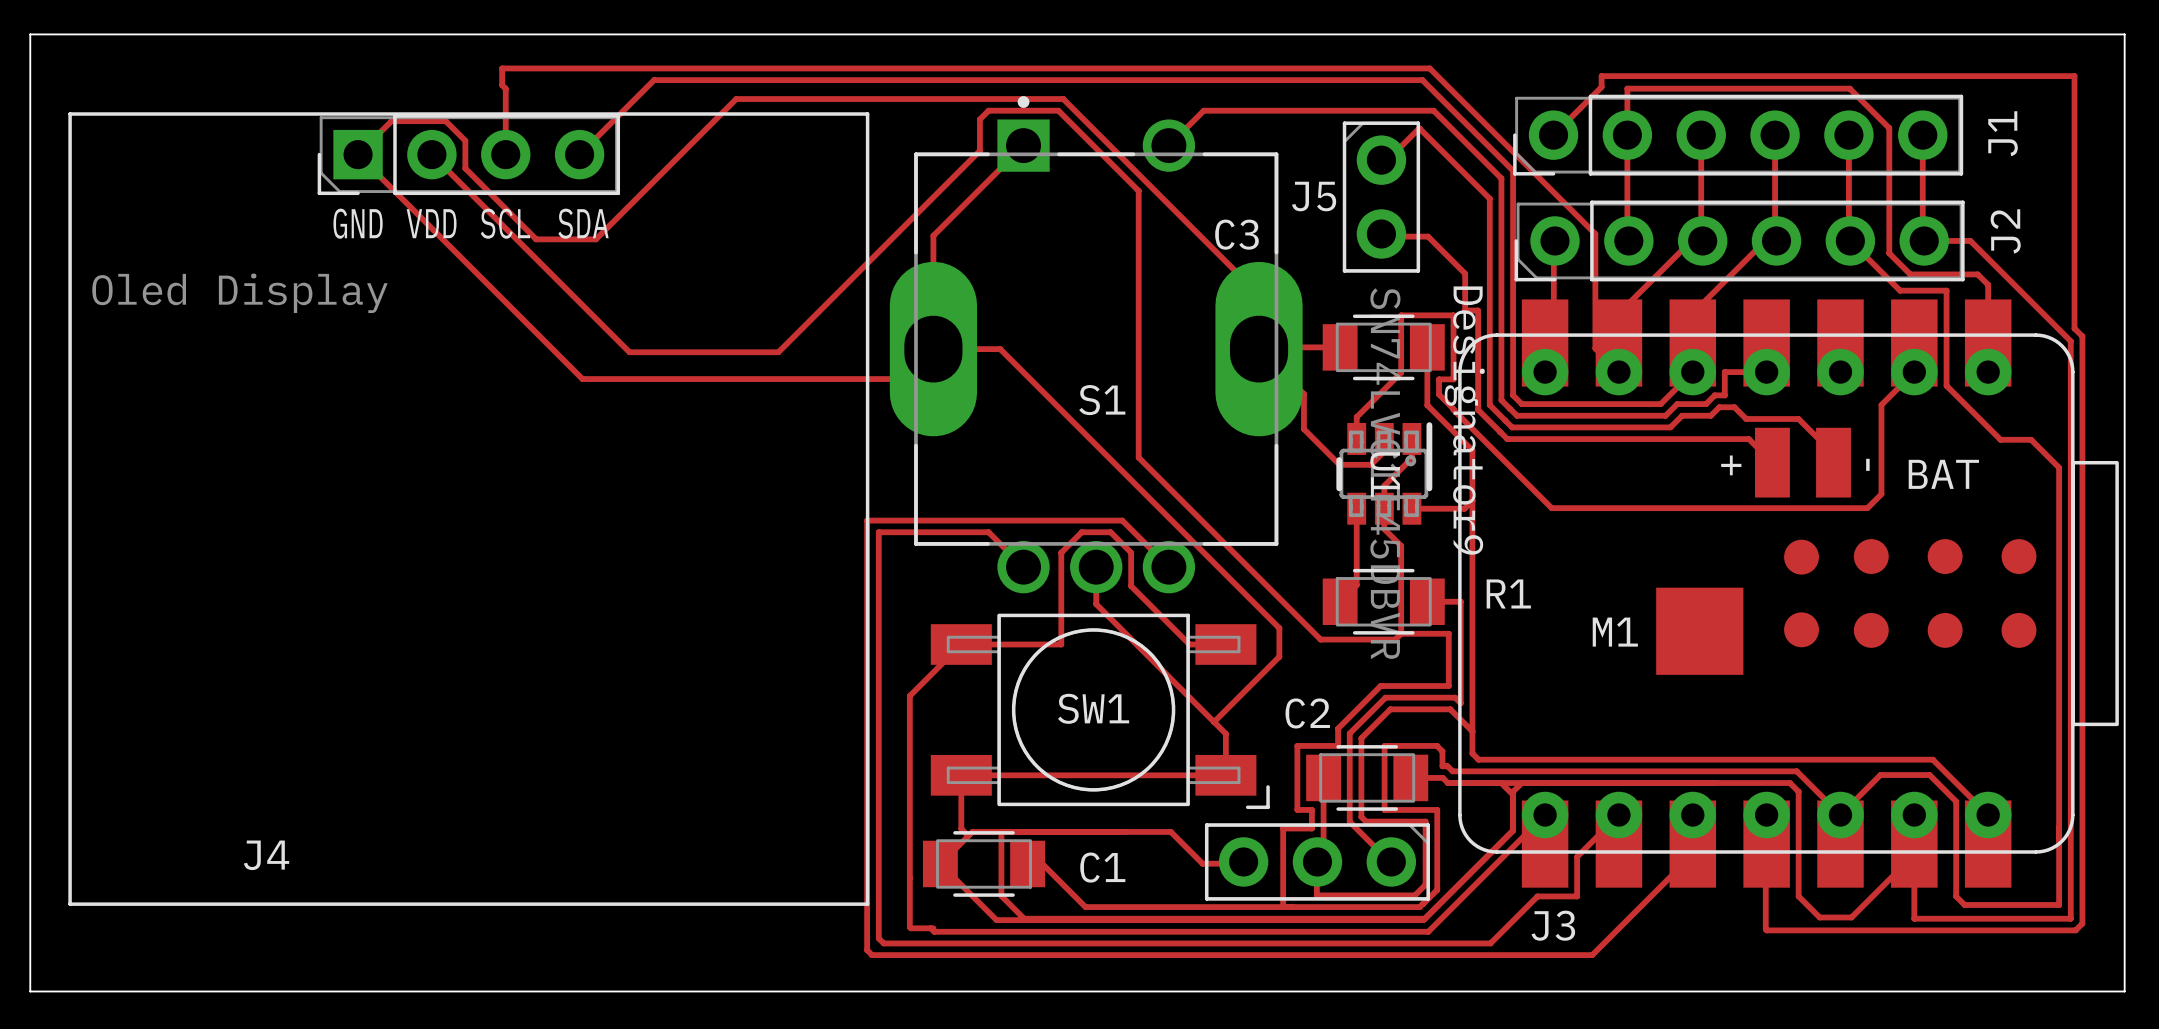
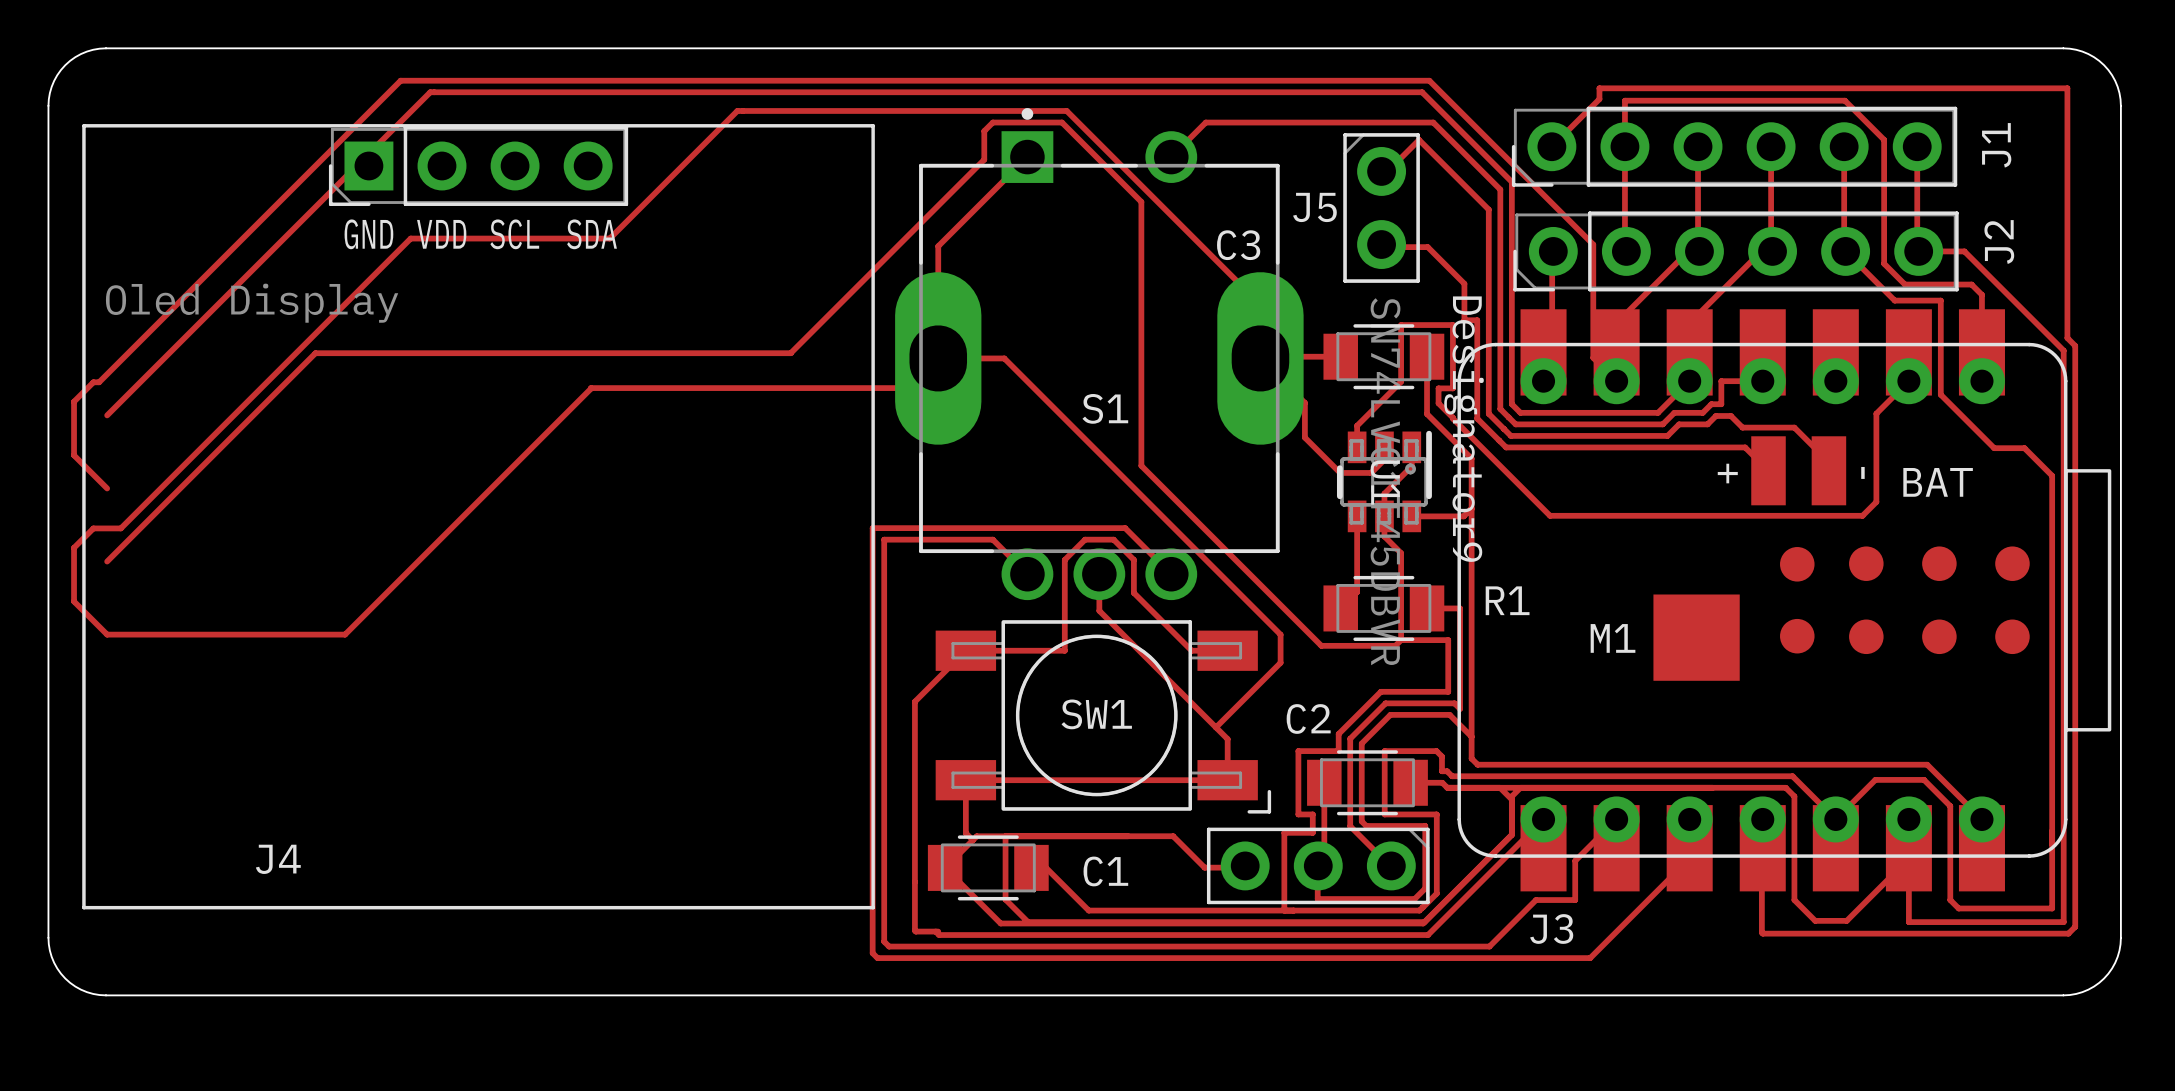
board edge: (30, 34) (2124, 34) (2124, 991) (30, 991) (30, 34) -> (105, 48) (81, 54) (65, 65) (54, 80) (48, 105) (48, 937) (49, 950) (57, 968) (70, 982) (81, 989) (105, 995) (2063, 995) (2082, 992) (2093, 986) (2104, 978) (2115, 962) (2120, 937) (2120, 105) (2117, 86) (2112, 75) (2099, 60) (2088, 54) (2063, 48) (105, 48)
top track: (502, 68) (502, 85) (505, 88) (505, 154) -> (511, 80) (400, 80) (99, 382) (93, 382) (74, 401) (74, 455) (107, 488)
top track: (654, 80) (579, 154) -> (661, 92) (430, 92) (107, 415)
top track: (736, 99) (595, 239) (536, 239) (465, 168) (465, 140) (445, 121) (391, 121) (358, 154) (582, 379) -> (743, 110) (737, 110) (609, 238) (410, 238) (120, 528) (93, 528) (74, 547) (74, 601) (107, 634) (345, 634) (591, 388)
top track: (979, 148) (979, 150) (778, 352) (629, 352) (431, 154) -> (984, 159) (791, 352)
top track: none -> (791, 353) (315, 353) (107, 561)

